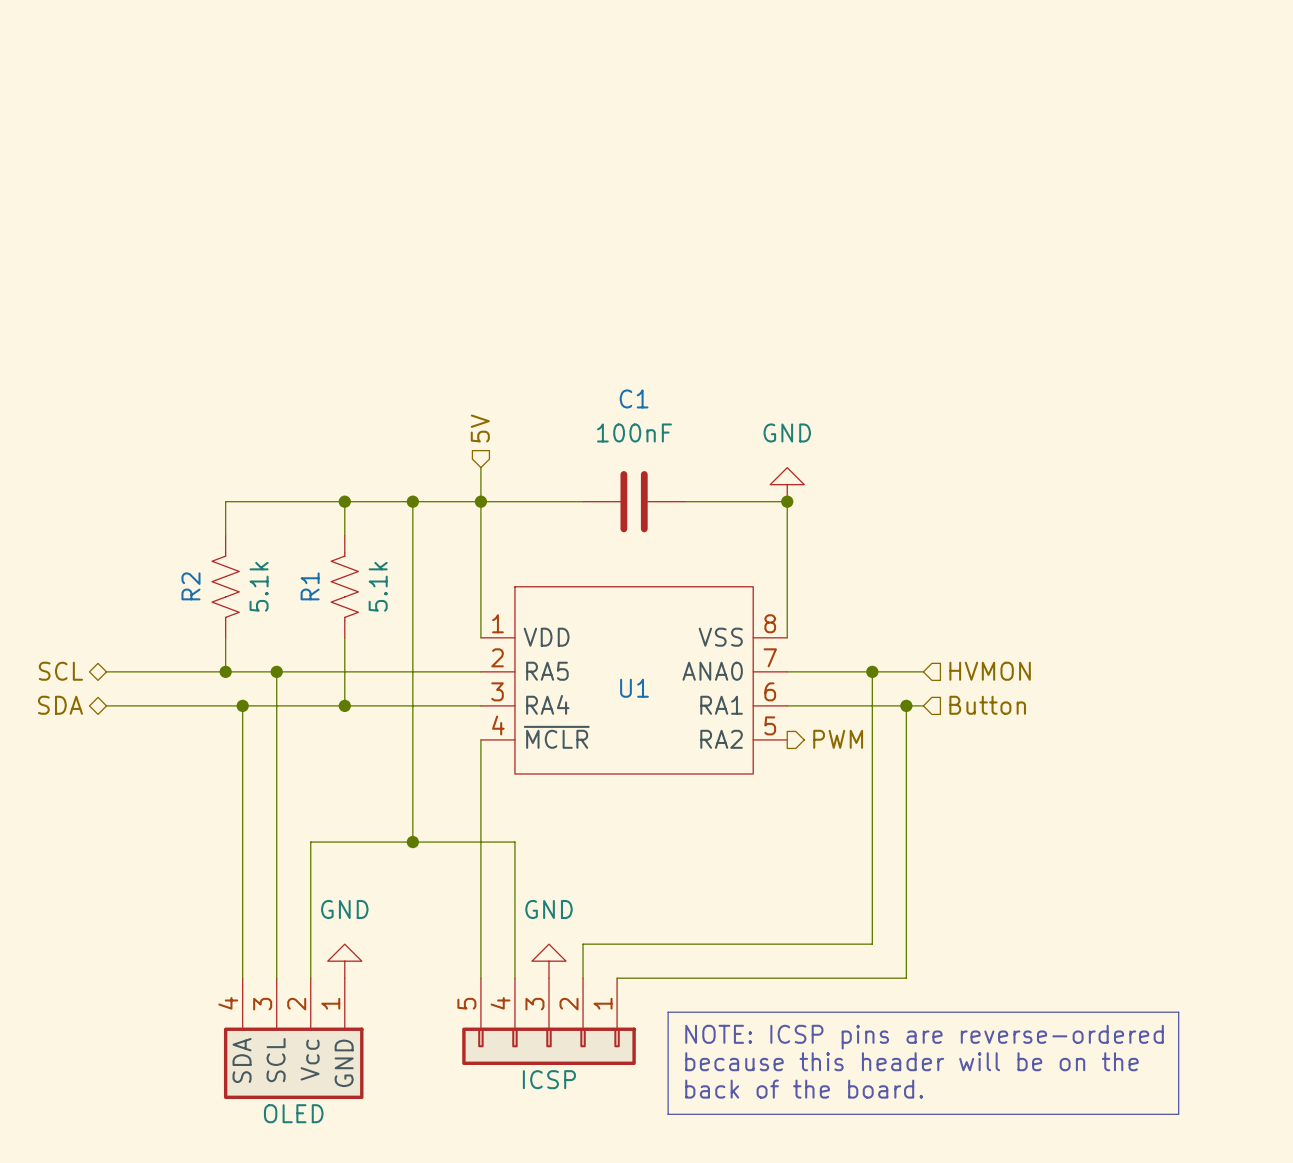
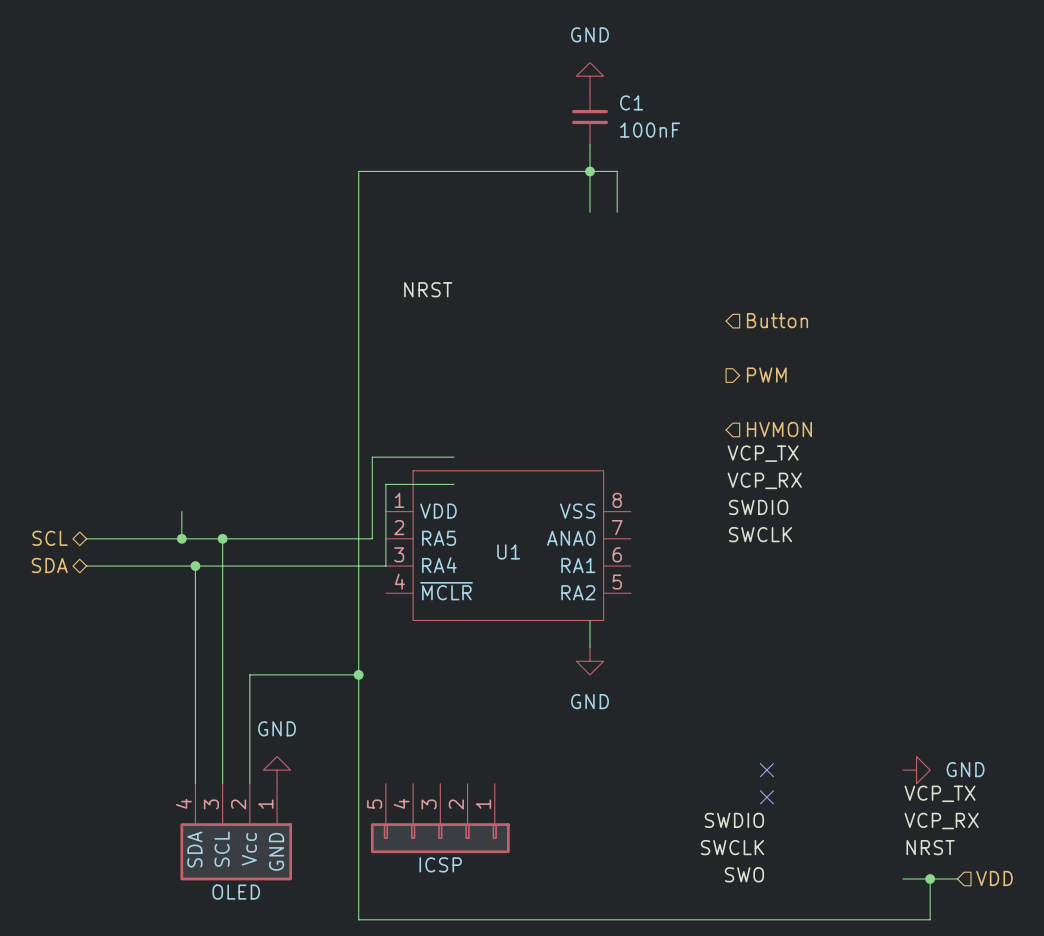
power symbol: none -> GND (590, 76)
wire: none -> (590, 144) (590, 212)
junction: none -> (590, 171)
wire: none -> (617, 212) (617, 171) (358, 171) (358, 919) (930, 919) (930, 878)
label: none -> NRST (428, 289)
C1 name position: C1 (634, 398) -> C1 (631, 102)
hierarchical label: 5V (480, 428) -> none
C1 value position: 100nF (634, 432) -> 100nF (650, 130)
wire: (480, 467) (480, 603) -> (453, 484) (385, 484)
C1 symbol: [583, 471, 686, 533] -> [572, 89, 608, 145]
power symbol: GND (787, 484) -> none
wire: (344, 501) (344, 535) -> none
junction: (344, 501) -> none
wire: (412, 501) (412, 842) -> none
junction: (412, 501) -> none
junction: (480, 501) -> none
wire: (583, 501) (225, 501) (225, 535) -> none
wire: (685, 501) (787, 501) (787, 637) -> none
junction: (787, 501) -> none
label: none -> VCP_TX (763, 453)
R2: 5.1k (225, 586) -> none
R1: 5.1k (344, 586) -> none
label: none -> VCP_RX (764, 480)
label: none -> SWDIO (758, 507)
wire: (344, 637) (344, 705) -> (385, 511) (385, 566)
label: none -> SWCLK (760, 534)
wire: (463, 671) (480, 671) -> (372, 538) (372, 457) (453, 457)
wire: (787, 671) (923, 671) -> none
wire: (872, 671) (872, 944) (583, 944) (583, 978) -> none
junction: (872, 671) -> none
hierarchical label position: HVMON (990, 671) -> HVMON (779, 429)
junction: (344, 705) -> none
wire: (787, 705) (923, 705) -> none
wire: (906, 705) (906, 978) (617, 978) -> none
junction: (906, 705) -> none
hierarchical label position: Button (987, 705) -> Button (777, 320)
wire: (480, 739) (480, 978) -> none
hierarchical label position: PWM (838, 739) -> PWM (766, 375)
wire: none -> (590, 620) (590, 647)
power symbol: none -> GND (590, 661)
junction position: (412, 842) -> (358, 674)
wire: (446, 842) (514, 842) (514, 978) -> none
power symbol: GND (548, 961) -> none
no-connect mark: none -> (766, 770)
power symbol: none -> GND (916, 770)
label: none -> VCP_TX (940, 793)
no-connect mark: none -> (766, 797)
line: (668, 1012) (1178, 1012) (1178, 1114) (668, 1114) (668, 1012) -> none
label: none -> SWDIO (734, 820)
label: none -> VCP_RX (941, 821)
text: NOTE: ICSP pins are reverse-ordered (924, 1037) -> none
label: none -> SWCLK (732, 847)
label: none -> NRST (930, 847)
text: because this header will be on the (911, 1061) -> none
text: back of the board. (804, 1089) -> none
label: none -> SWO (744, 874)
hierarchical label: none -> VDD (994, 878)
wire: none -> (902, 878) (957, 878)
junction: none -> (930, 878)

